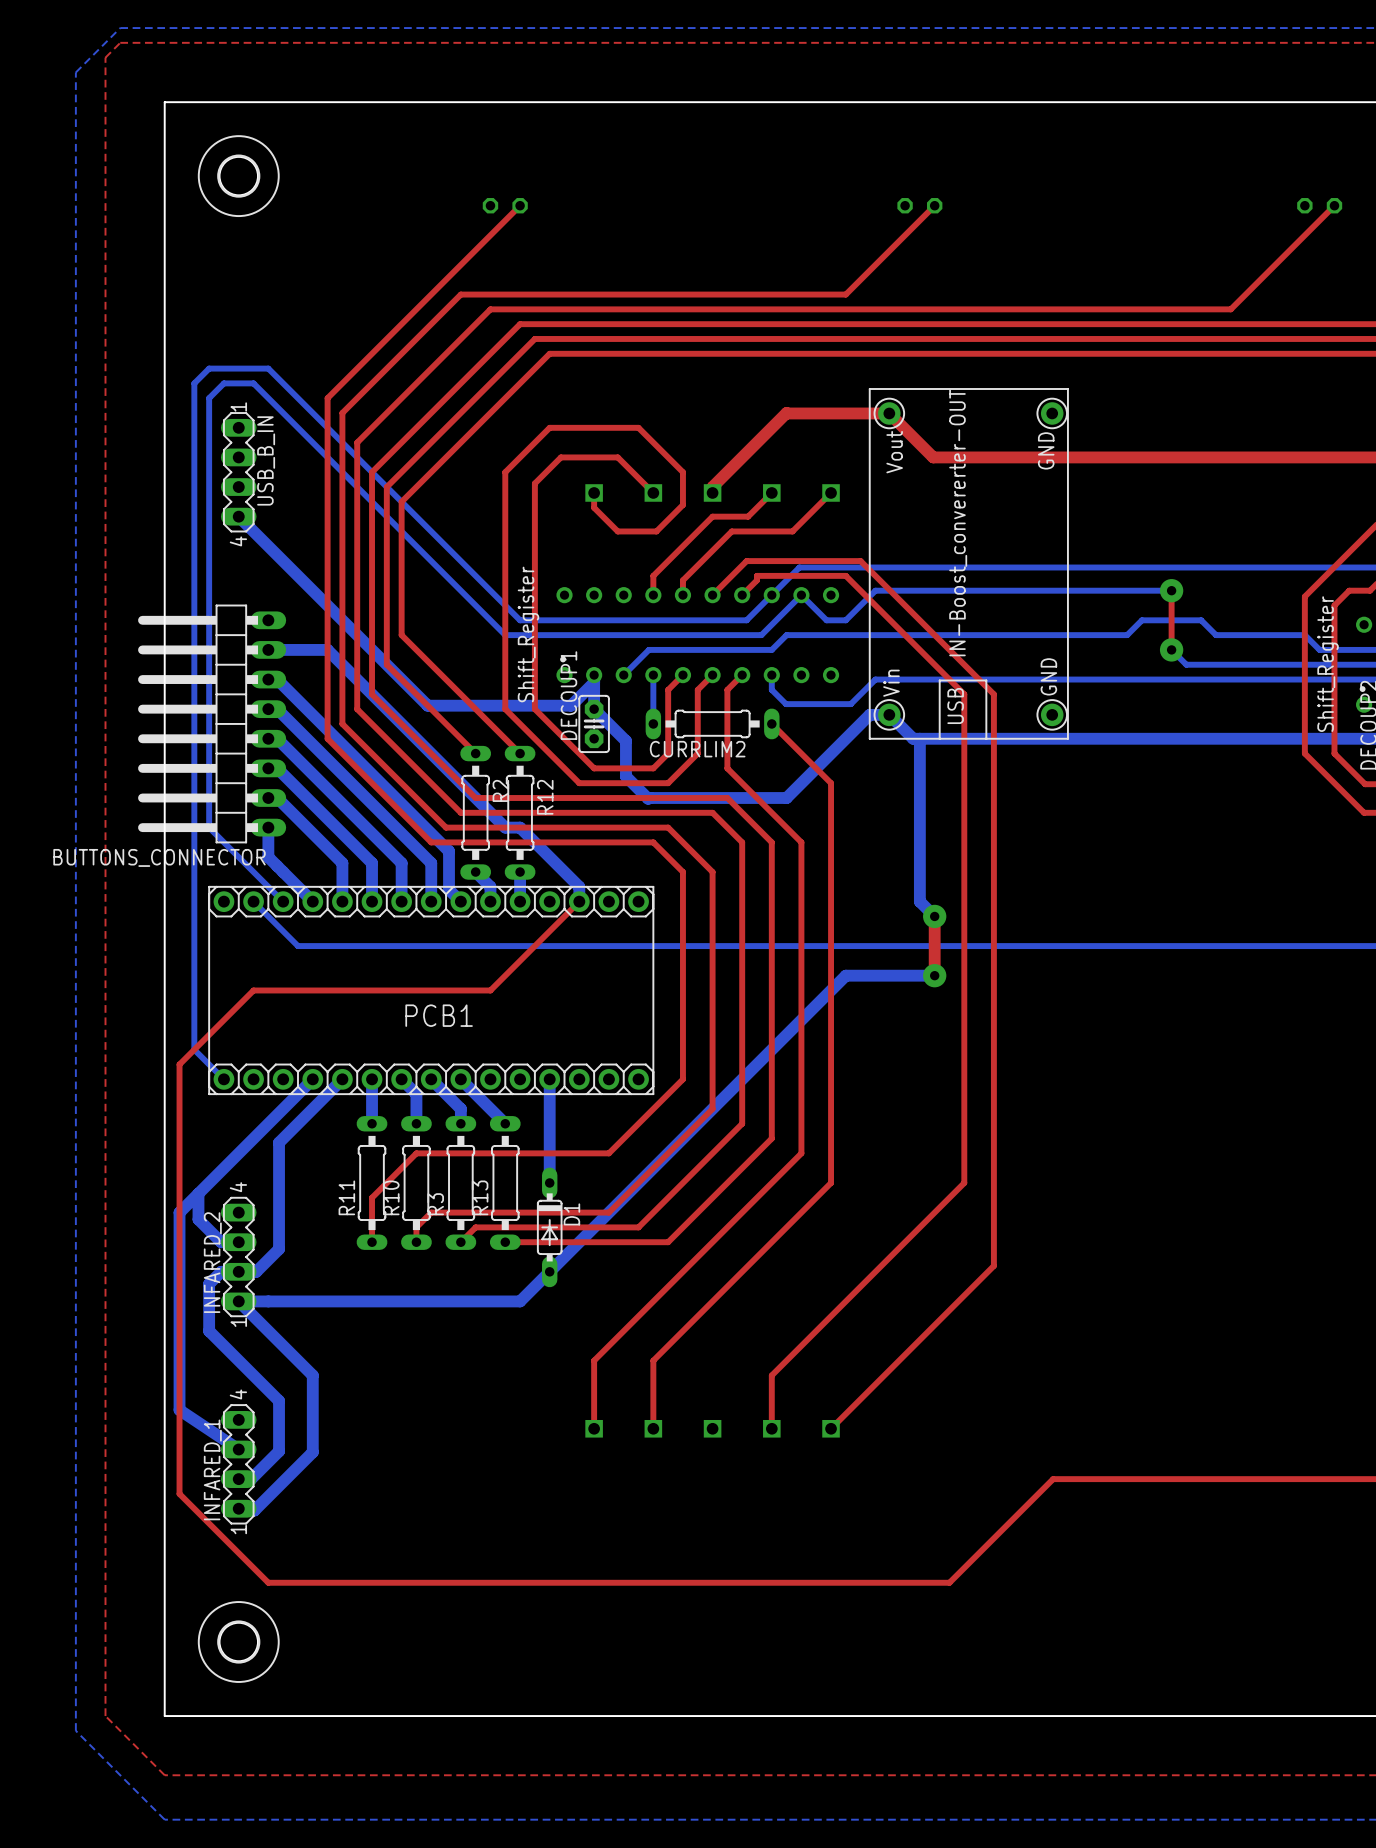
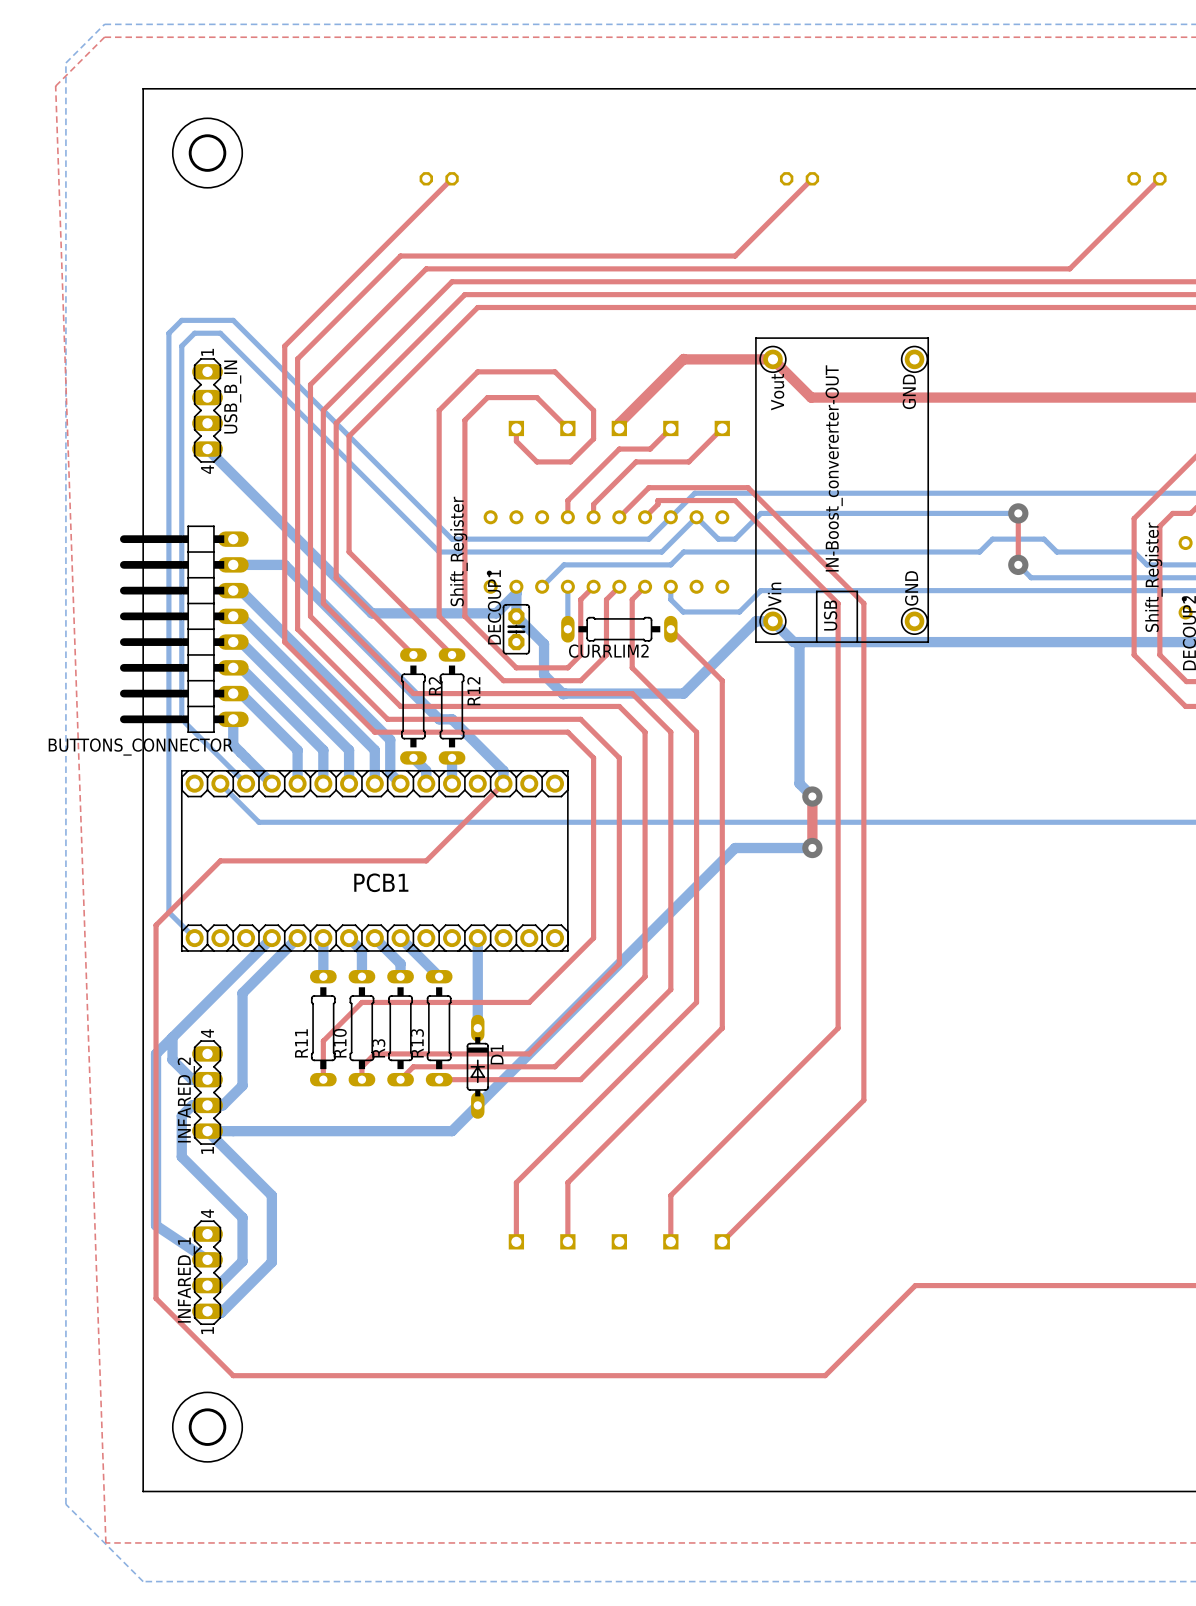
top zone outline: (105, 57) (105, 1716) (164, 1775) -> (91, 50) (55, 86) (105, 1542) (143, 1542)

